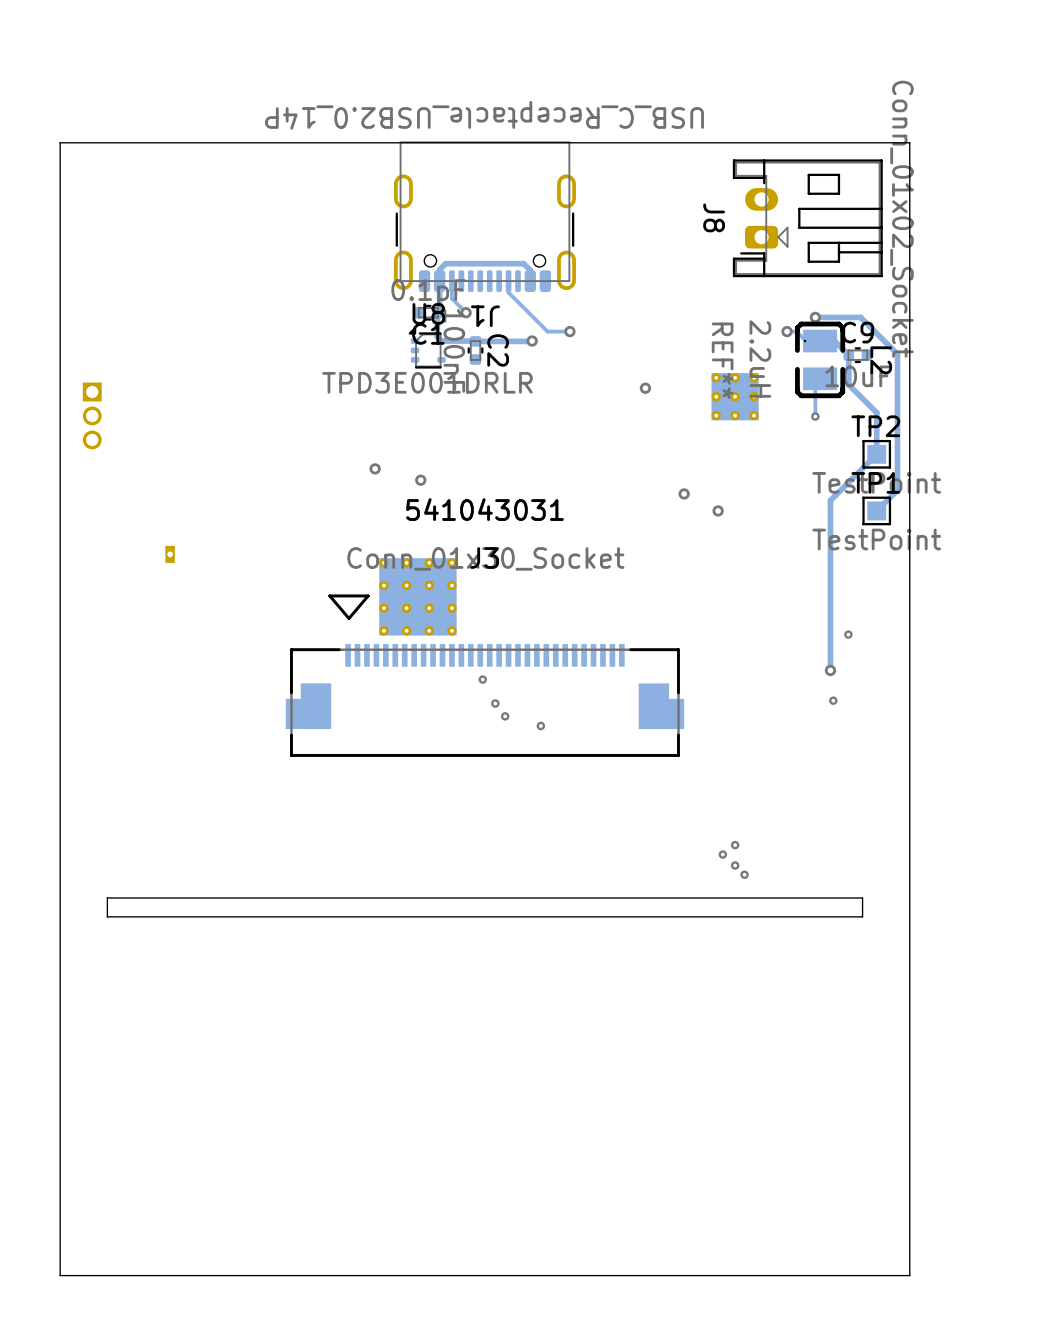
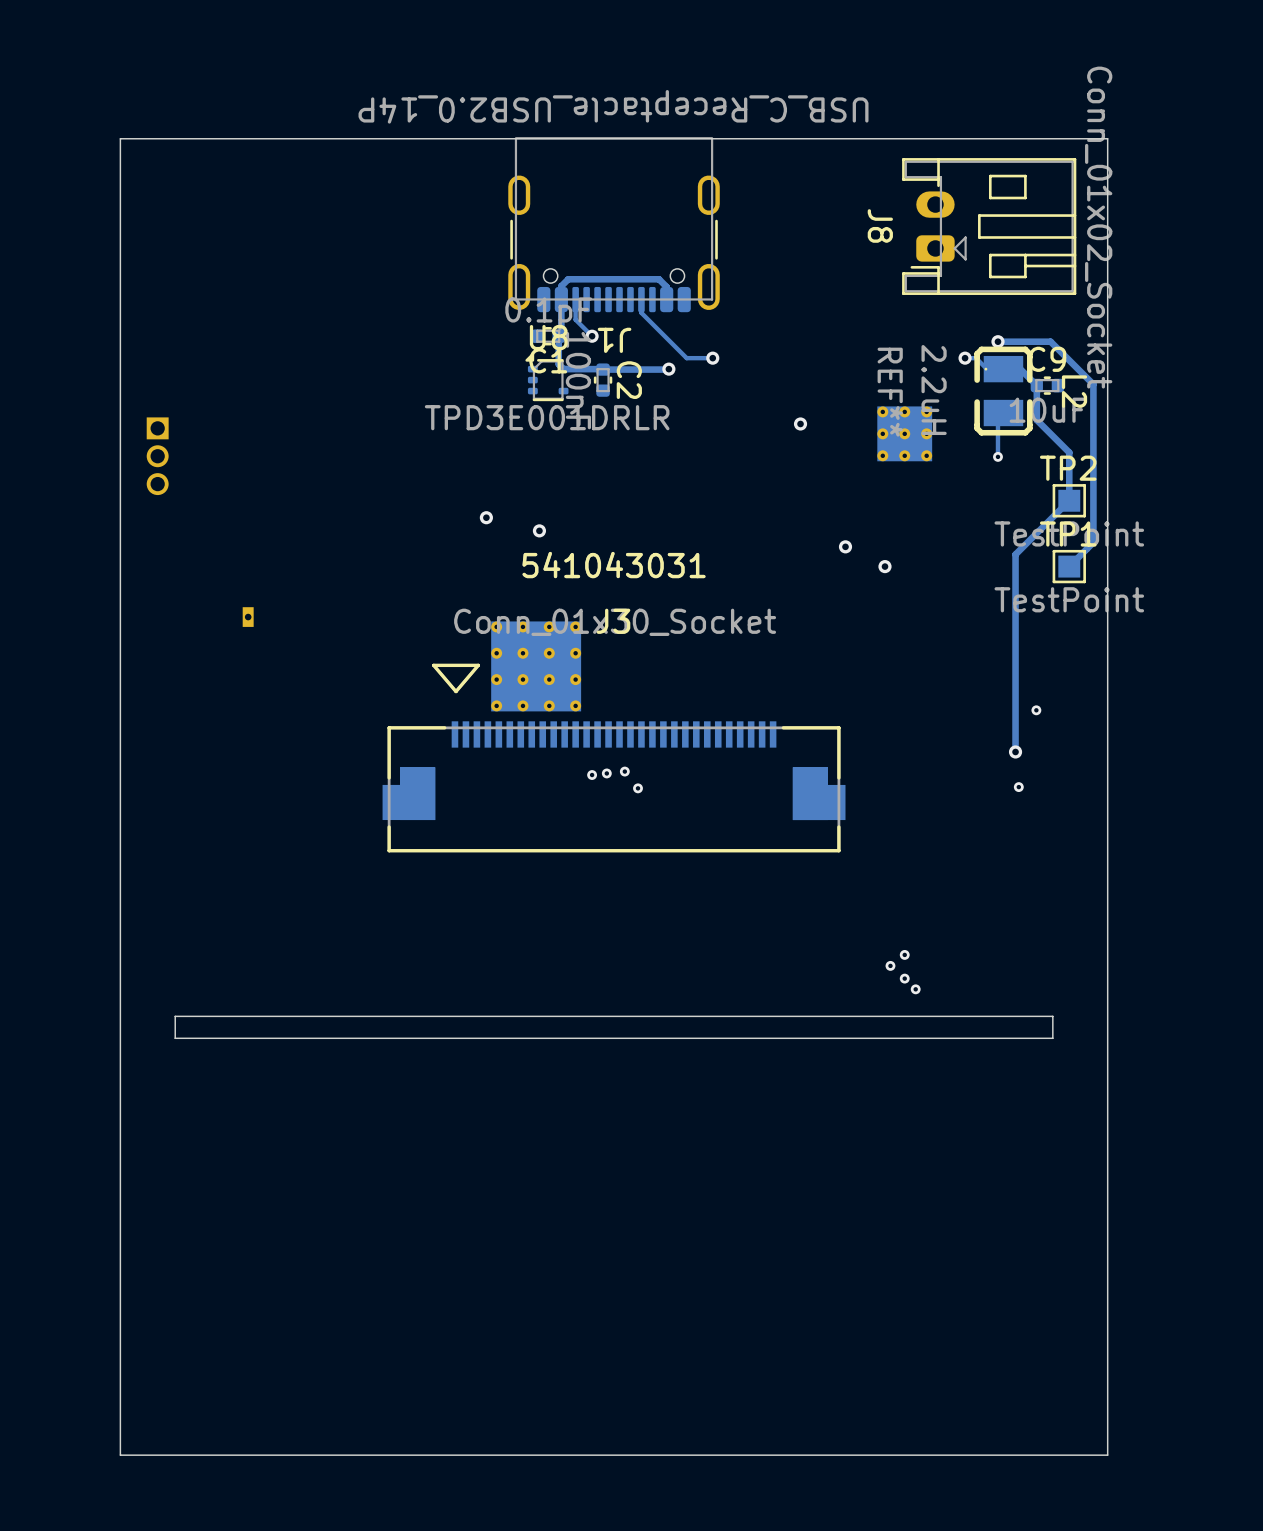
via: (482, 679) -> none
via: none -> (624, 771)
via: none -> (606, 773)
via: none -> (592, 775)
via: none -> (638, 788)
via: (495, 703) -> none
via: (505, 716) -> none
via: (540, 725) -> none

